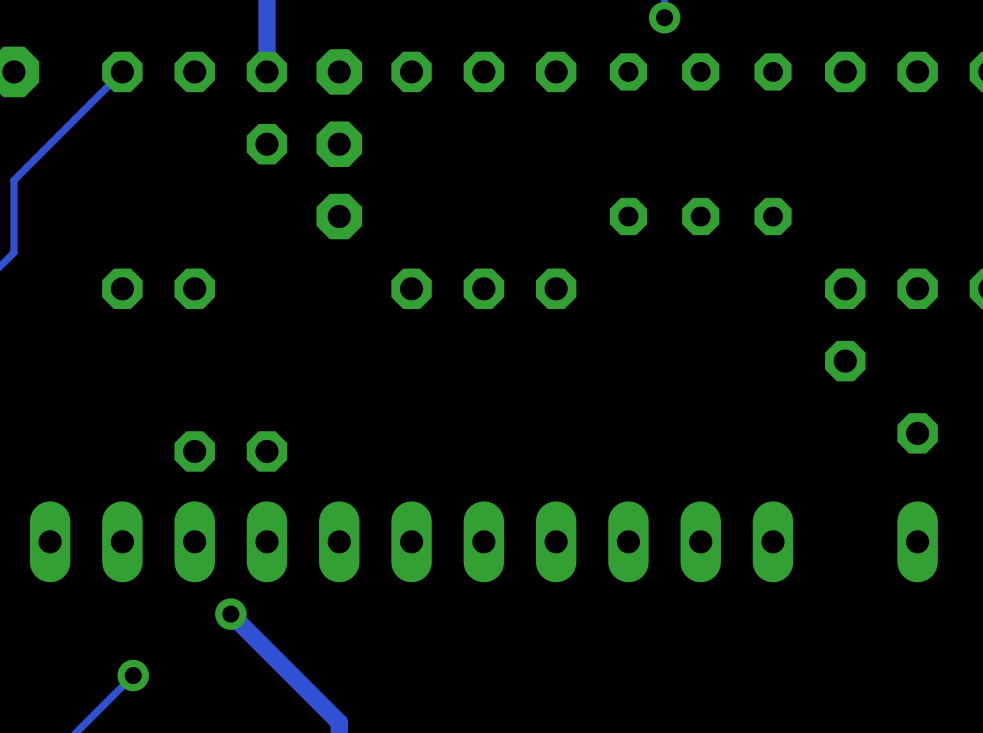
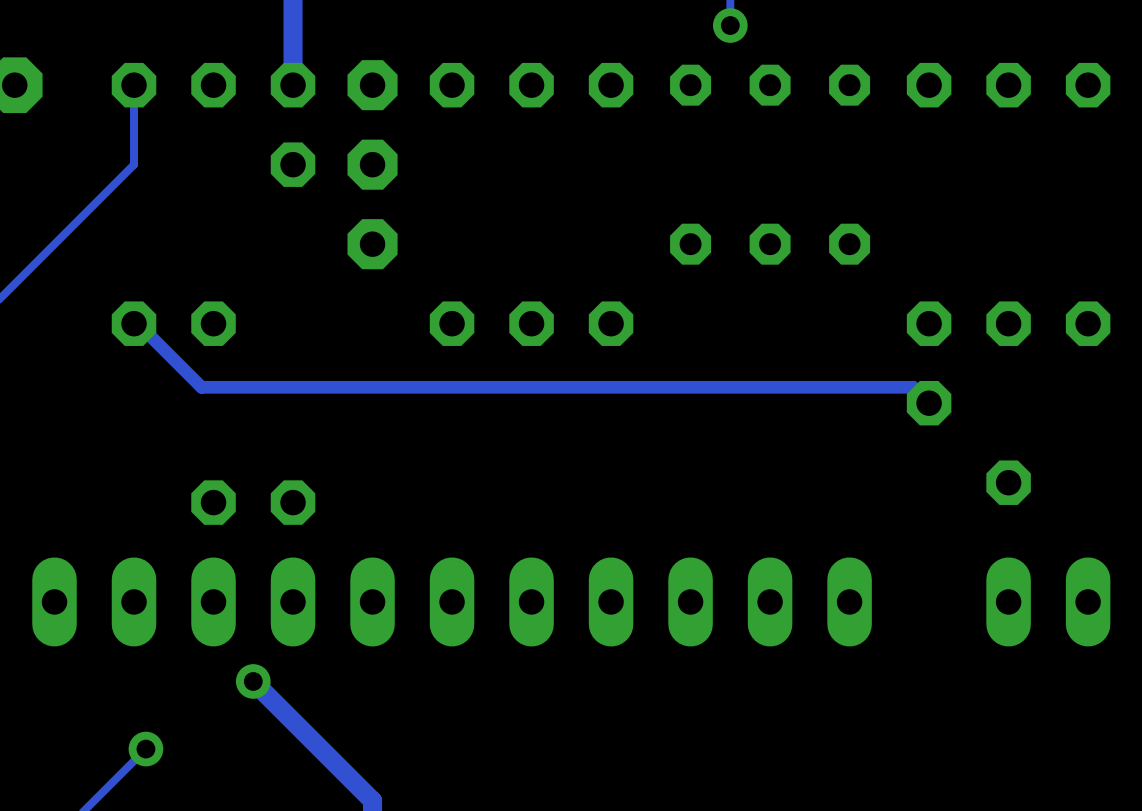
track: (122, 71) (13, 180) (13, 252) -> (134, 85) (134, 164) (14, 283)
track: none -> (134, 323) (137, 323) (201, 387) (913, 387) (929, 403)

